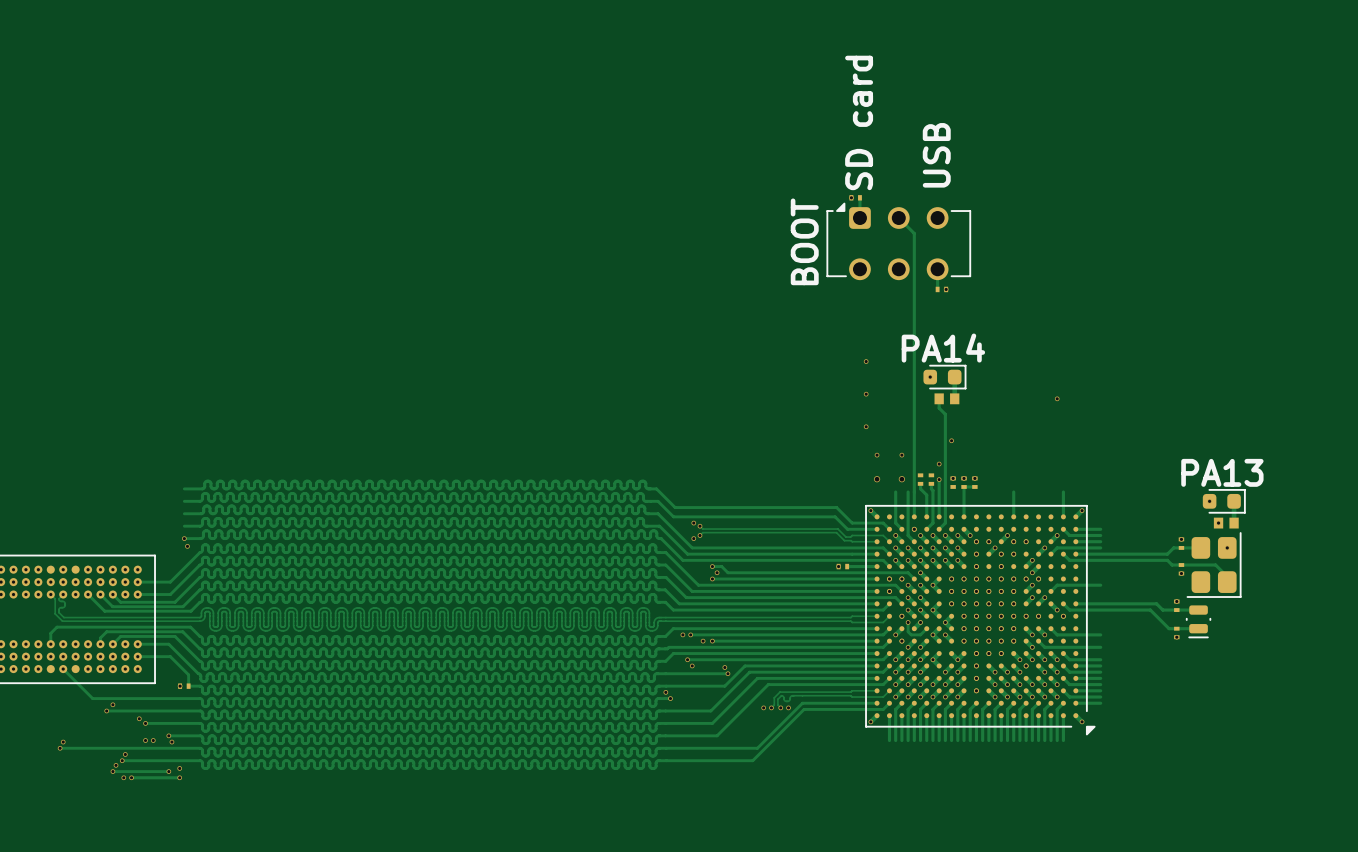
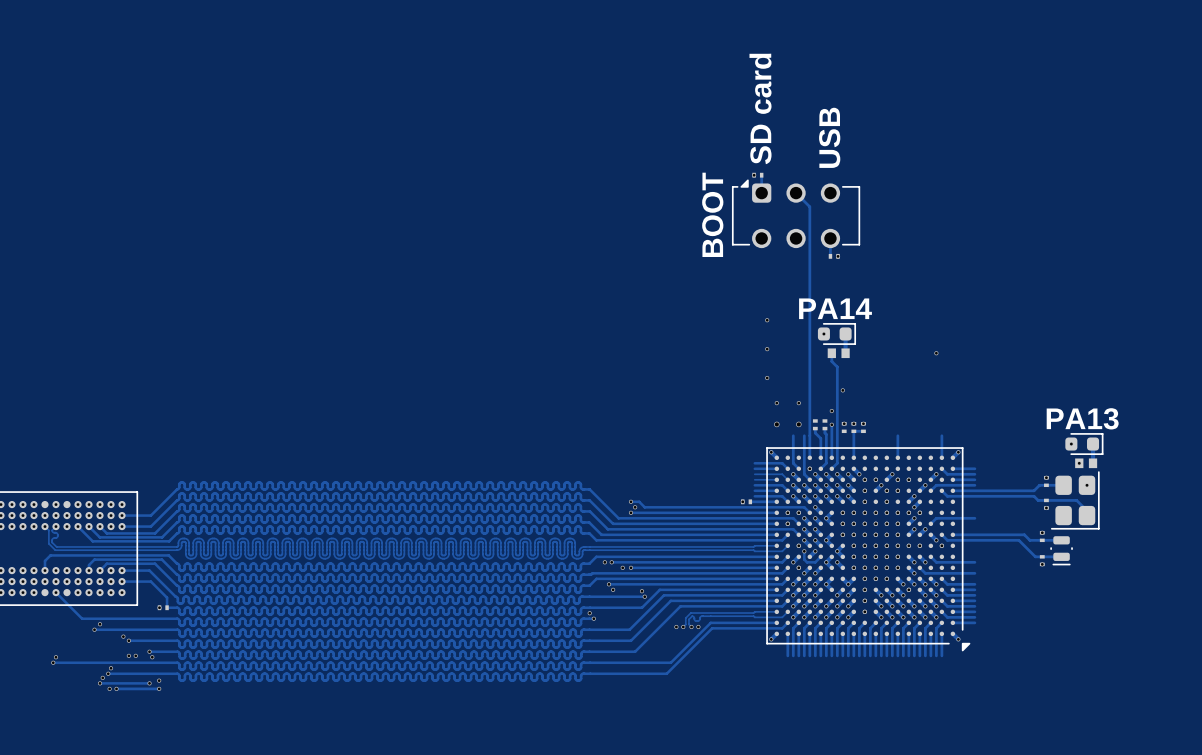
track: (184, 488) (202, 488) (207, 481) (210, 482) (213, 488) (216, 487) (219, 481) (222, 482) (225, 488) (229, 487) (232, 481) (235, 482) (238, 488) (241, 487) (244, 481) (247, 482) (250, 488) (253, 487) (256, 481) (260, 482) (263, 488) (266, 487) (269, 481) (272, 482) (275, 488) (278, 487) (281, 481) (285, 482) (288, 488) (291, 487) (294, 481) (297, 482) (300, 488) (303, 487) (306, 481) (309, 482) (312, 488) (316, 487) (319, 481) (322, 482) (325, 488) (328, 487) (331, 481) (334, 482) (337, 488) (340, 487) (343, 481) (347, 482) (350, 488) (353, 487) (356, 481) (359, 482) (362, 488) (365, 487) (368, 481) (372, 482) (375, 488) (378, 487) (381, 481) (384, 482) (387, 488) (390, 487) (393, 481) (396, 482) (399, 488) (403, 487) (406, 481) (409, 482) (412, 488) (415, 487) (418, 481) (421, 482) (424, 488) (427, 487) (430, 481) (434, 482) (437, 488) (440, 487) (443, 481) (446, 482) (449, 488) (452, 487) (455, 481) (458, 482) (461, 488) (465, 487) (468, 481) (471, 482) (474, 488) (477, 487) (480, 481) (483, 482) (486, 488) (490, 487) (493, 481) (496, 482) (499, 488) (502, 487) (505, 481) (508, 482) (511, 488) (514, 487) (517, 481) (521, 482) (524, 488) (527, 487) (530, 481) (533, 482) (536, 488) (539, 487) (542, 481) (545, 482) (548, 488) (552, 487) (555, 481) (558, 482) (561, 488) (564, 487) (567, 481) (570, 482) (573, 488) (577, 487) (580, 481) (583, 482) (585, 488) (589, 487) (592, 481) (595, 482) (597, 488) (601, 488) (602, 482) (606, 481) (609, 488) (612, 488) (615, 482) (618, 481) (621, 487) (625, 488) (627, 482) (630, 481) (633, 487) (637, 488) (640, 482) (643, 481) (646, 488) (656, 488) (675, 507) (836, 507) (852, 523) -> none
track: (184, 501) (200, 501) (204, 493) (208, 494) (211, 501) (214, 500) (217, 493) (220, 494) (223, 501) (226, 500) (229, 493) (232, 494) (235, 501) (239, 500) (242, 493) (245, 494) (248, 501) (251, 500) (254, 493) (257, 494) (260, 501) (263, 500) (266, 493) (270, 494) (273, 501) (276, 500) (279, 493) (282, 494) (285, 501) (288, 500) (291, 493) (295, 494) (298, 501) (301, 500) (304, 493) (307, 494) (310, 501) (313, 500) (316, 493) (319, 494) (322, 501) (326, 500) (329, 493) (332, 494) (335, 501) (338, 500) (341, 493) (344, 494) (347, 501) (350, 500) (353, 493) (357, 494) (360, 501) (363, 500) (366, 493) (369, 494) (372, 501) (375, 500) (378, 493) (381, 494) (384, 501) (388, 500) (391, 493) (394, 494) (397, 501) (400, 500) (403, 493) (406, 494) (409, 501) (413, 500) (416, 493) (419, 494) (422, 501) (425, 500) (428, 493) (431, 494) (434, 501) (437, 500) (440, 493) (444, 494) (447, 501) (450, 500) (453, 493) (456, 494) (459, 501) (462, 500) (465, 493) (468, 494) (471, 501) (475, 500) (478, 493) (481, 494) (484, 501) (487, 500) (490, 493) (493, 494) (496, 501) (500, 500) (503, 493) (506, 494) (509, 501) (512, 500) (515, 493) (518, 494) (521, 501) (524, 500) (527, 493) (531, 494) (534, 501) (537, 500) (539, 493) (543, 494) (546, 501) (549, 500) (551, 493) (555, 494) (556, 500) (560, 501) (563, 494) (567, 493) (569, 500) (572, 501) (575, 494) (579, 493) (581, 500) (585, 501) (588, 494) (591, 493) (594, 500) (597, 501) (600, 494) (603, 493) (606, 500) (609, 501) (612, 494) (616, 493) (619, 500) (622, 501) (625, 494) (628, 493) (631, 500) (634, 501) (637, 494) (640, 493) (644, 500) (658, 501) (673, 516) (835, 516) (847, 529) (852, 529) -> none
track: (184, 513) (202, 513) (206, 505) (209, 506) (212, 513) (215, 512) (218, 505) (221, 506) (224, 513) (228, 512) (231, 505) (234, 506) (237, 513) (240, 512) (243, 505) (246, 506) (249, 513) (252, 512) (255, 505) (259, 506) (262, 513) (265, 512) (268, 505) (271, 506) (274, 513) (277, 512) (280, 505) (284, 506) (287, 513) (290, 512) (293, 505) (296, 506) (299, 513) (302, 512) (305, 505) (308, 506) (311, 513) (315, 512) (318, 505) (321, 506) (324, 513) (327, 512) (330, 505) (333, 506) (336, 513) (339, 512) (342, 505) (346, 506) (349, 513) (352, 512) (355, 505) (358, 506) (361, 513) (364, 512) (367, 505) (371, 506) (374, 513) (377, 512) (380, 505) (383, 506) (386, 513) (389, 512) (392, 505) (395, 506) (398, 513) (402, 512) (405, 505) (408, 506) (411, 513) (414, 512) (417, 505) (420, 506) (423, 513) (426, 512) (429, 505) (433, 506) (436, 513) (439, 512) (442, 505) (445, 506) (448, 513) (451, 512) (454, 505) (457, 506) (460, 513) (464, 512) (467, 505) (470, 506) (473, 513) (476, 512) (479, 505) (482, 506) (485, 513) (489, 512) (492, 505) (495, 506) (498, 513) (501, 512) (504, 505) (507, 506) (510, 513) (513, 512) (516, 505) (520, 506) (523, 513) (526, 512) (529, 505) (532, 506) (535, 513) (538, 512) (541, 505) (544, 506) (547, 513) (551, 512) (554, 505) (557, 506) (560, 513) (563, 512) (566, 505) (569, 506) (572, 513) (576, 512) (579, 505) (582, 506) (584, 513) (588, 513) (589, 507) (592, 505) (595, 513) (599, 513) (601, 506) (605, 505) (608, 512) (611, 513) (614, 506) (617, 505) (620, 512) (624, 513) (626, 506) (629, 505) (632, 512) (636, 513) (639, 506) (642, 505) (646, 513) (658, 513) (692, 547) (852, 547) -> none
via: (693, 523) -> none
track: (184, 526) (201, 525) (205, 518) (208, 519) (211, 526) (214, 525) (217, 518) (220, 519) (223, 526) (226, 525) (229, 518) (233, 519) (236, 526) (239, 525) (242, 518) (245, 519) (248, 526) (251, 525) (254, 518) (257, 519) (260, 526) (264, 525) (267, 518) (270, 519) (273, 526) (276, 525) (279, 518) (282, 519) (285, 526) (289, 525) (292, 518) (295, 519) (298, 526) (301, 525) (304, 518) (307, 519) (310, 526) (313, 525) (316, 518) (320, 519) (323, 526) (326, 525) (329, 518) (332, 519) (335, 526) (338, 525) (341, 518) (344, 519) (347, 526) (351, 525) (354, 518) (357, 519) (360, 526) (363, 525) (366, 518) (369, 519) (372, 526) (376, 525) (379, 518) (382, 519) (385, 526) (388, 525) (391, 518) (394, 519) (397, 526) (400, 525) (403, 518) (407, 519) (410, 526) (413, 525) (416, 518) (419, 519) (422, 526) (425, 525) (428, 518) (431, 519) (434, 526) (438, 525) (441, 518) (444, 519) (447, 526) (450, 525) (453, 518) (456, 519) (459, 526) (462, 525) (465, 518) (469, 519) (472, 526) (475, 525) (478, 518) (481, 519) (484, 526) (487, 525) (490, 518) (494, 519) (497, 526) (500, 525) (503, 518) (506, 519) (509, 526) (512, 525) (515, 518) (518, 519) (521, 526) (525, 525) (528, 518) (531, 519) (533, 526) (537, 525) (540, 518) (543, 519) (546, 526) (549, 525) (552, 518) (556, 519) (558, 525) (562, 525) (563, 519) (566, 518) (569, 525) (573, 526) (575, 519) (579, 518) (582, 525) (585, 526) (588, 519) (591, 518) (594, 525) (598, 526) (600, 519) (603, 518) (606, 525) (610, 526) (613, 519) (616, 518) (619, 525) (622, 526) (625, 519) (628, 518) (631, 525) (634, 526) (637, 519) (641, 518) (645, 525) (659, 526) (687, 554) (852, 554) -> none
track: (699, 526) (702, 529) (837, 529) (845, 537) (852, 535) -> none
via: (699, 526) -> none
track: (699, 535) (702, 532) (836, 532) (844, 540) (852, 541) -> none
via: (699, 535) -> none
track: (184, 538) (201, 538) (205, 530) (209, 531) (212, 538) (215, 537) (218, 530) (221, 531) (224, 538) (227, 537) (230, 530) (233, 531) (236, 538) (240, 537) (243, 530) (246, 531) (249, 538) (252, 537) (255, 530) (258, 531) (261, 538) (264, 537) (267, 530) (271, 531) (274, 538) (277, 537) (280, 530) (283, 531) (286, 538) (289, 537) (292, 530) (296, 531) (299, 538) (302, 537) (305, 530) (308, 531) (311, 538) (314, 537) (317, 530) (320, 531) (323, 538) (327, 537) (330, 530) (333, 531) (336, 538) (339, 537) (342, 530) (345, 531) (348, 538) (351, 537) (354, 530) (358, 531) (361, 538) (364, 537) (367, 530) (370, 531) (373, 538) (376, 537) (379, 530) (383, 531) (386, 538) (389, 537) (392, 530) (395, 531) (398, 538) (401, 537) (404, 530) (407, 531) (410, 538) (414, 537) (417, 530) (420, 531) (423, 538) (426, 537) (429, 530) (432, 531) (435, 538) (438, 537) (441, 530) (445, 531) (448, 538) (451, 537) (454, 530) (457, 531) (460, 538) (463, 537) (466, 530) (469, 531) (472, 538) (476, 537) (479, 530) (482, 531) (485, 538) (488, 537) (491, 530) (494, 531) (497, 538) (501, 537) (504, 530) (507, 531) (510, 538) (513, 537) (516, 530) (519, 531) (522, 538) (525, 537) (528, 530) (532, 531) (535, 538) (538, 537) (541, 530) (544, 531) (547, 538) (550, 537) (553, 530) (556, 531) (559, 538) (563, 537) (566, 530) (569, 531) (572, 538) (575, 537) (578, 530) (581, 531) (584, 538) (588, 537) (591, 530) (594, 531) (596, 538) (600, 537) (601, 532) (604, 530) (607, 537) (611, 538) (613, 531) (617, 530) (620, 537) (623, 538) (626, 531) (629, 530) (632, 537) (636, 538) (638, 531) (641, 530) (644, 537) (648, 538) (651, 531) (654, 530) (657, 537) (661, 538) (682, 560) (852, 560) -> none
via: (184, 538) -> none
via: (693, 538) -> none
via: (187, 546) -> none

